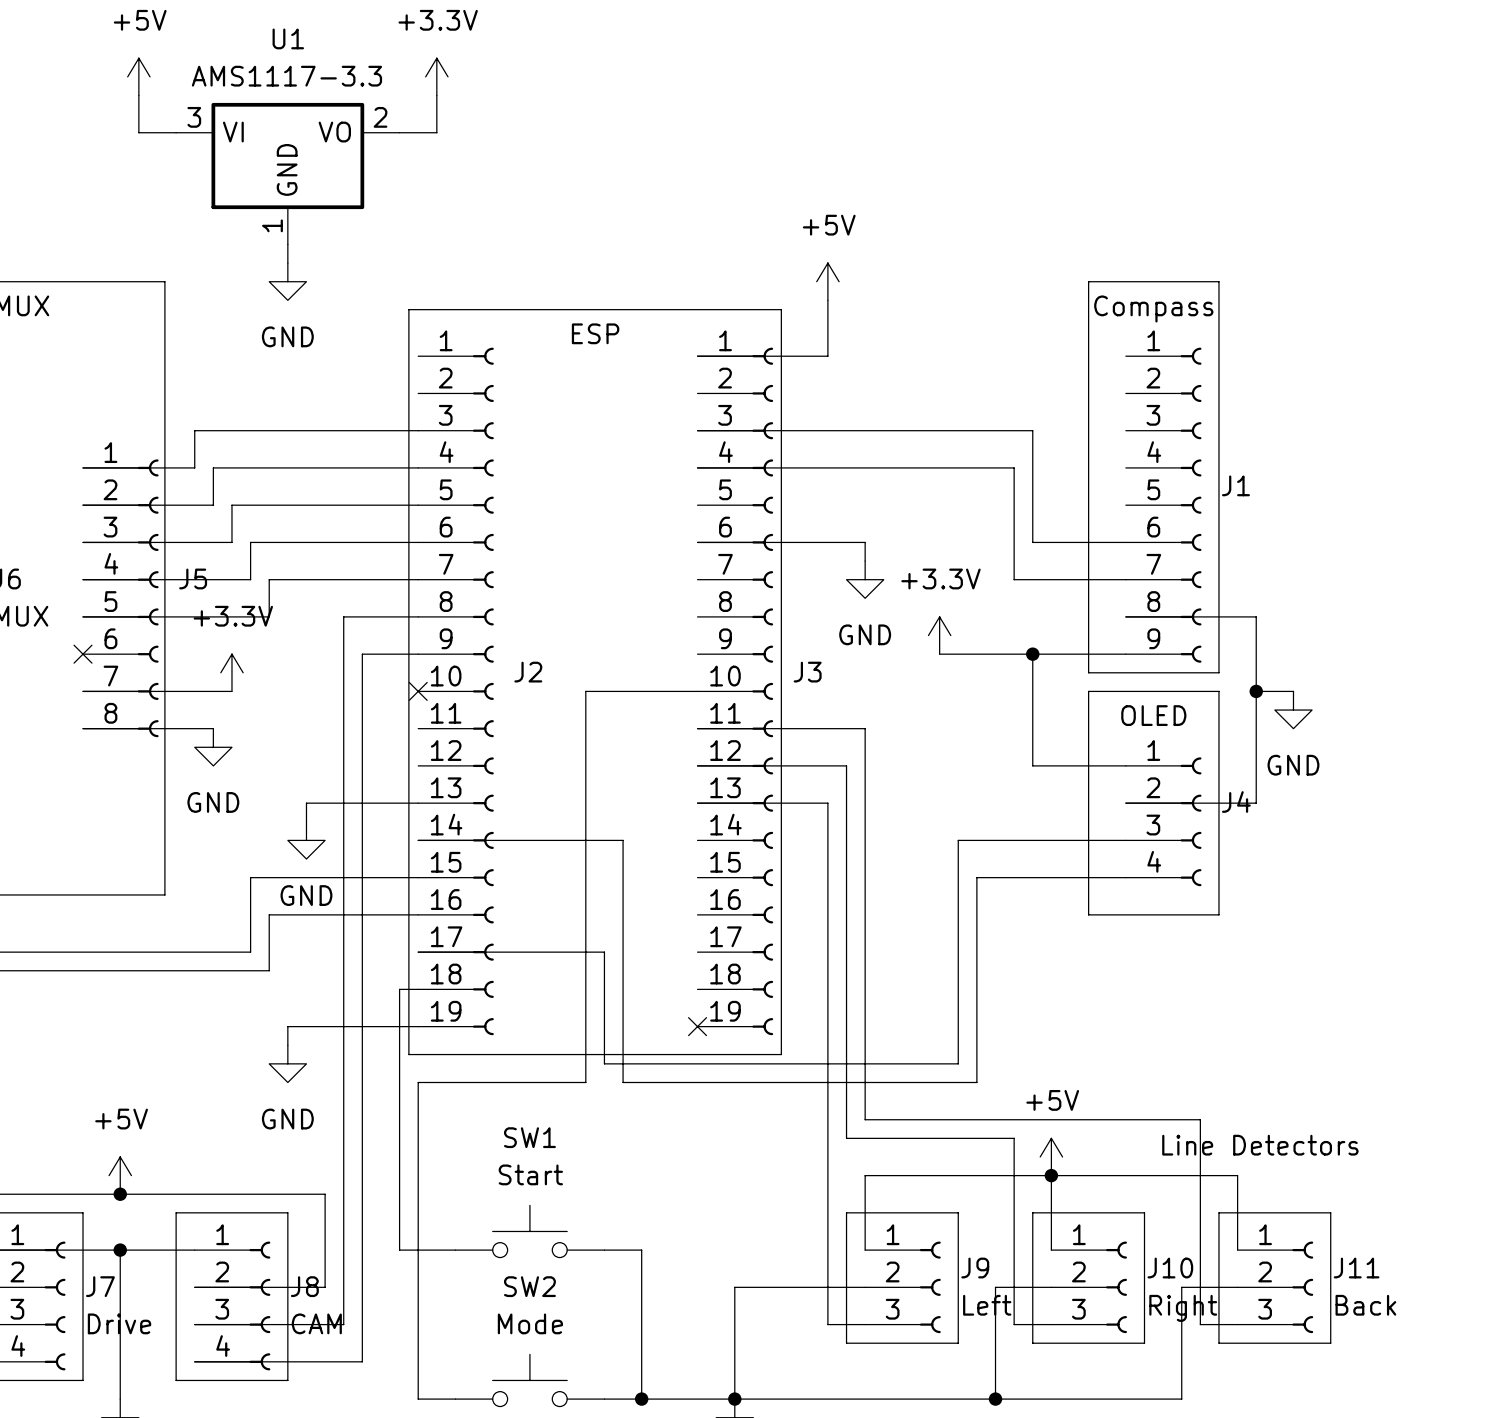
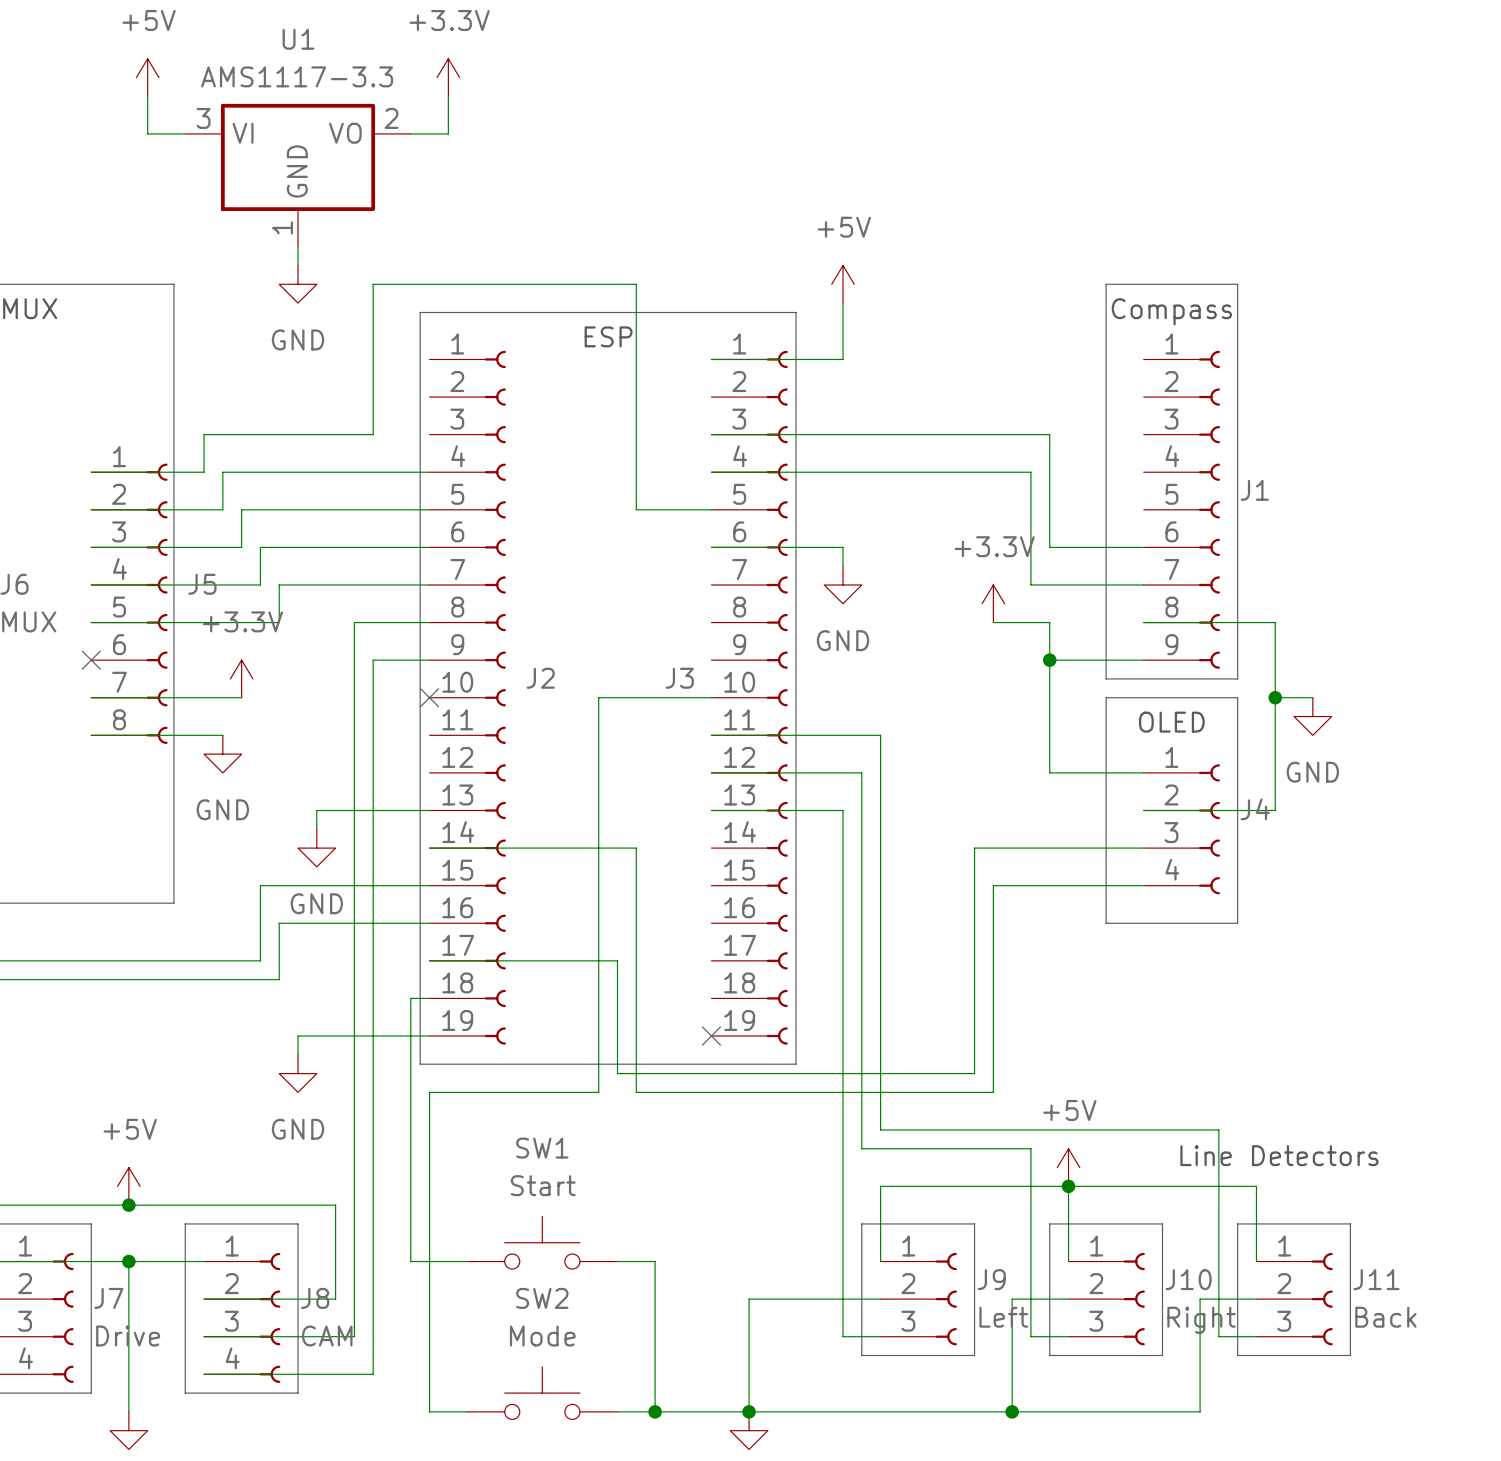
wire: (362, 430) (418, 430) -> (373, 434) (373, 284) (636, 284) (636, 509) (711, 509)
wire: (827, 542) (865, 542) (865, 561) -> (843, 547) (843, 566)
power symbol position: GND (865, 579) -> GND (843, 584)
power symbol position: +3.3V (939, 635) -> +3.3V (993, 603)
wire: (939, 654) (1032, 654) -> (993, 622) (1049, 622) (1049, 660)
J3 name position: J3 (807, 672) -> J3 (679, 678)

